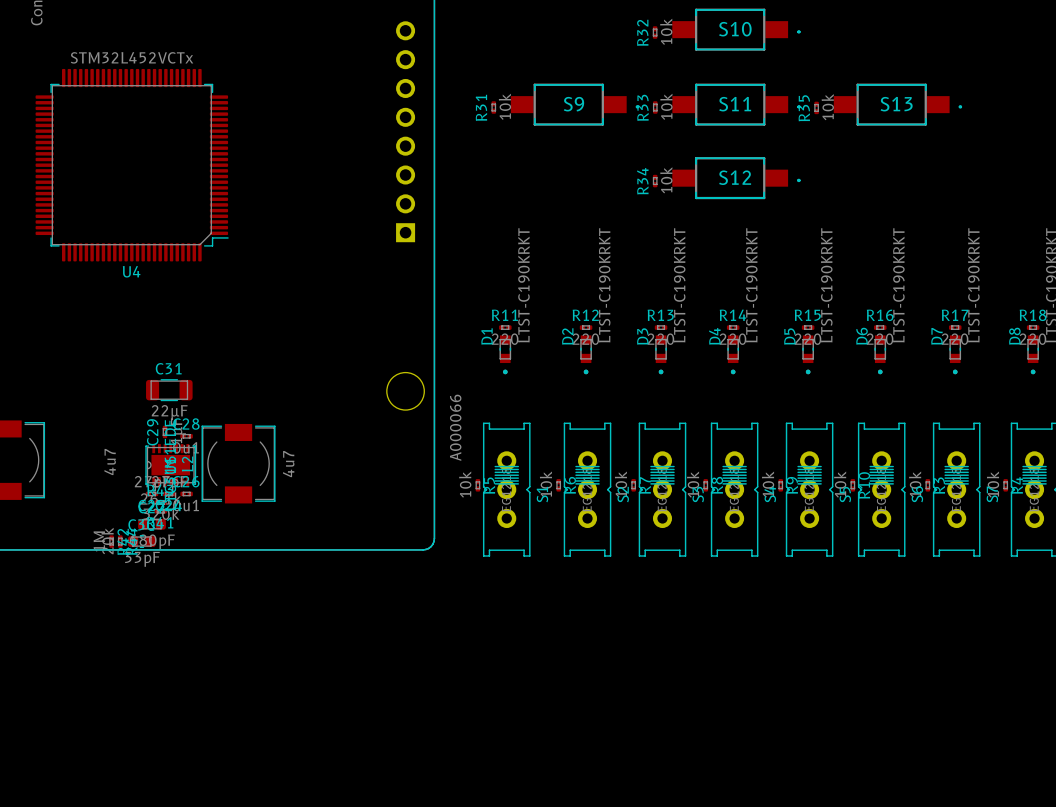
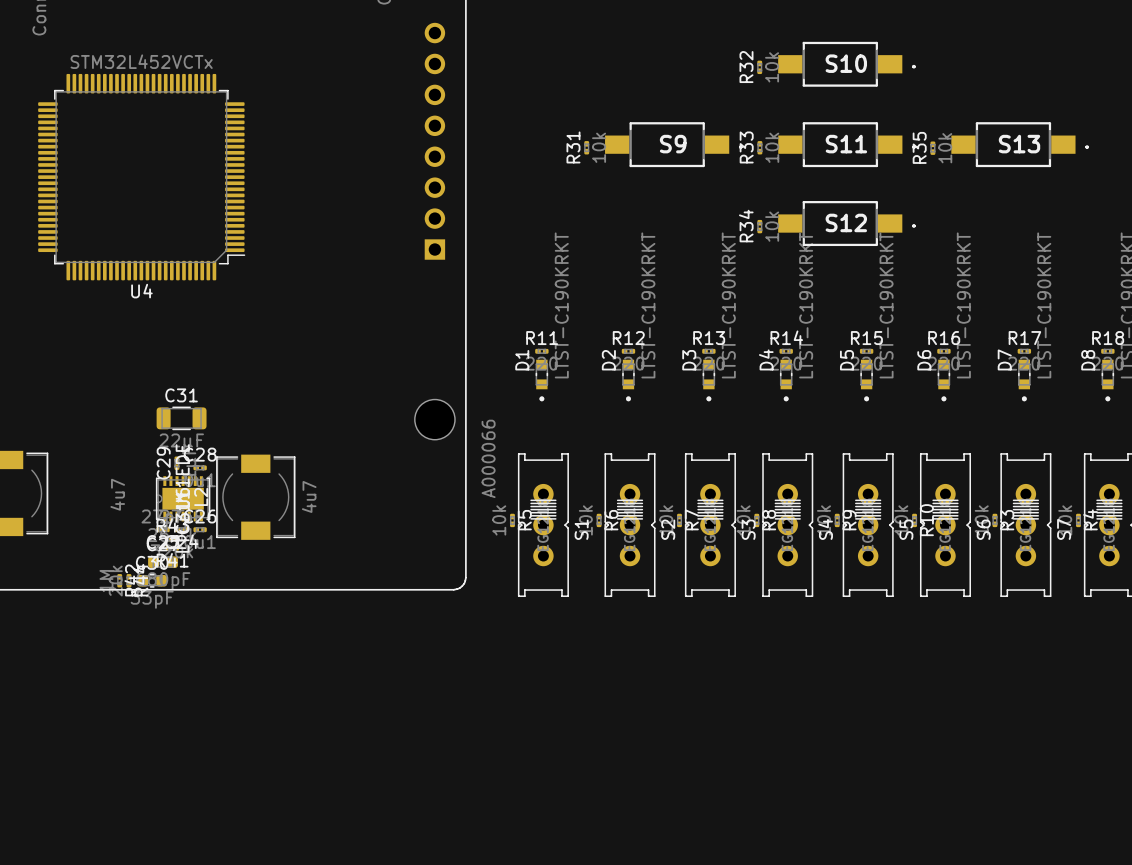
S10 position: (736, 29) -> (846, 64)
R32 position: (655, 32) -> (759, 67)
S9 position: (575, 104) -> (673, 144)
S11 position: (736, 104) -> (847, 144)
S13 position: (897, 104) -> (1020, 144)
R31 position: (493, 107) -> (586, 147)
R33 position: (655, 107) -> (759, 147)
R35 position: (816, 107) -> (932, 148)
S12 position: (736, 178) -> (846, 223)
R34 position: (655, 181) -> (759, 226)

